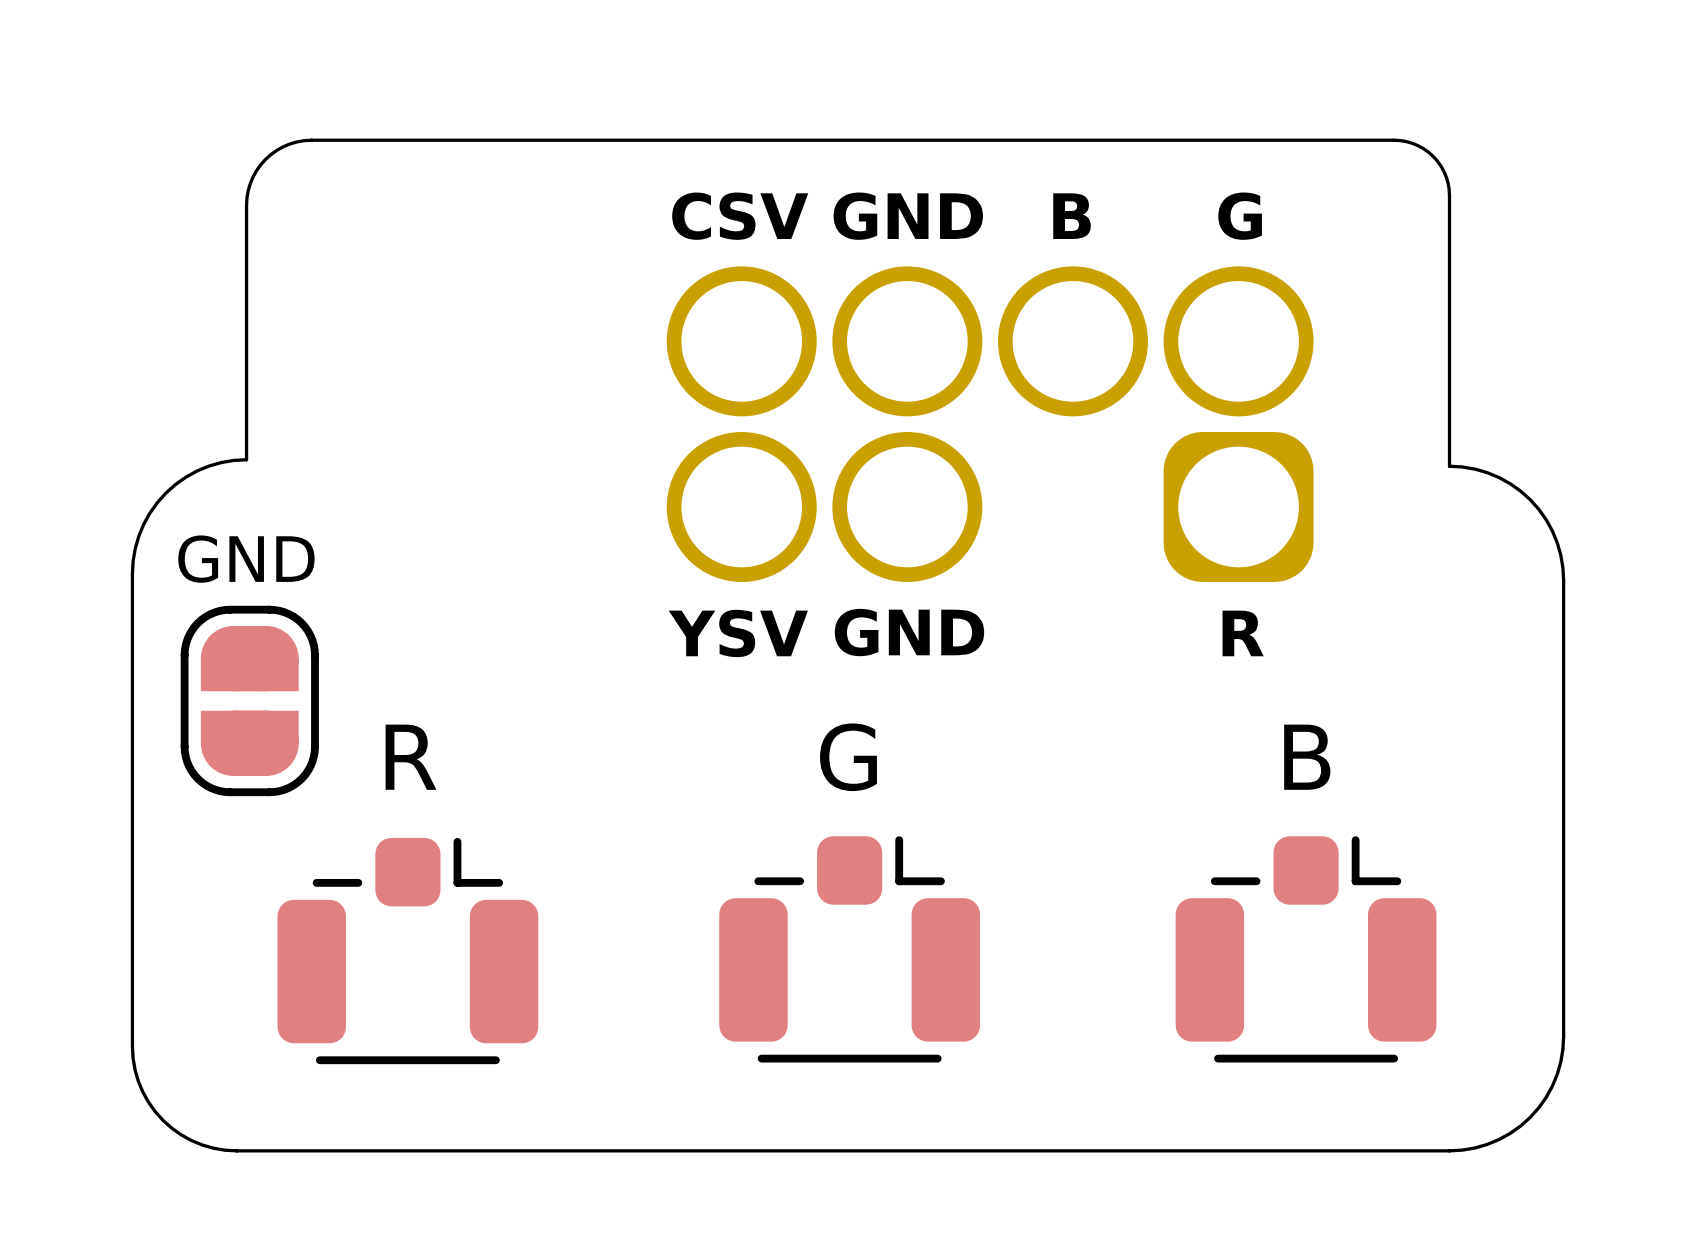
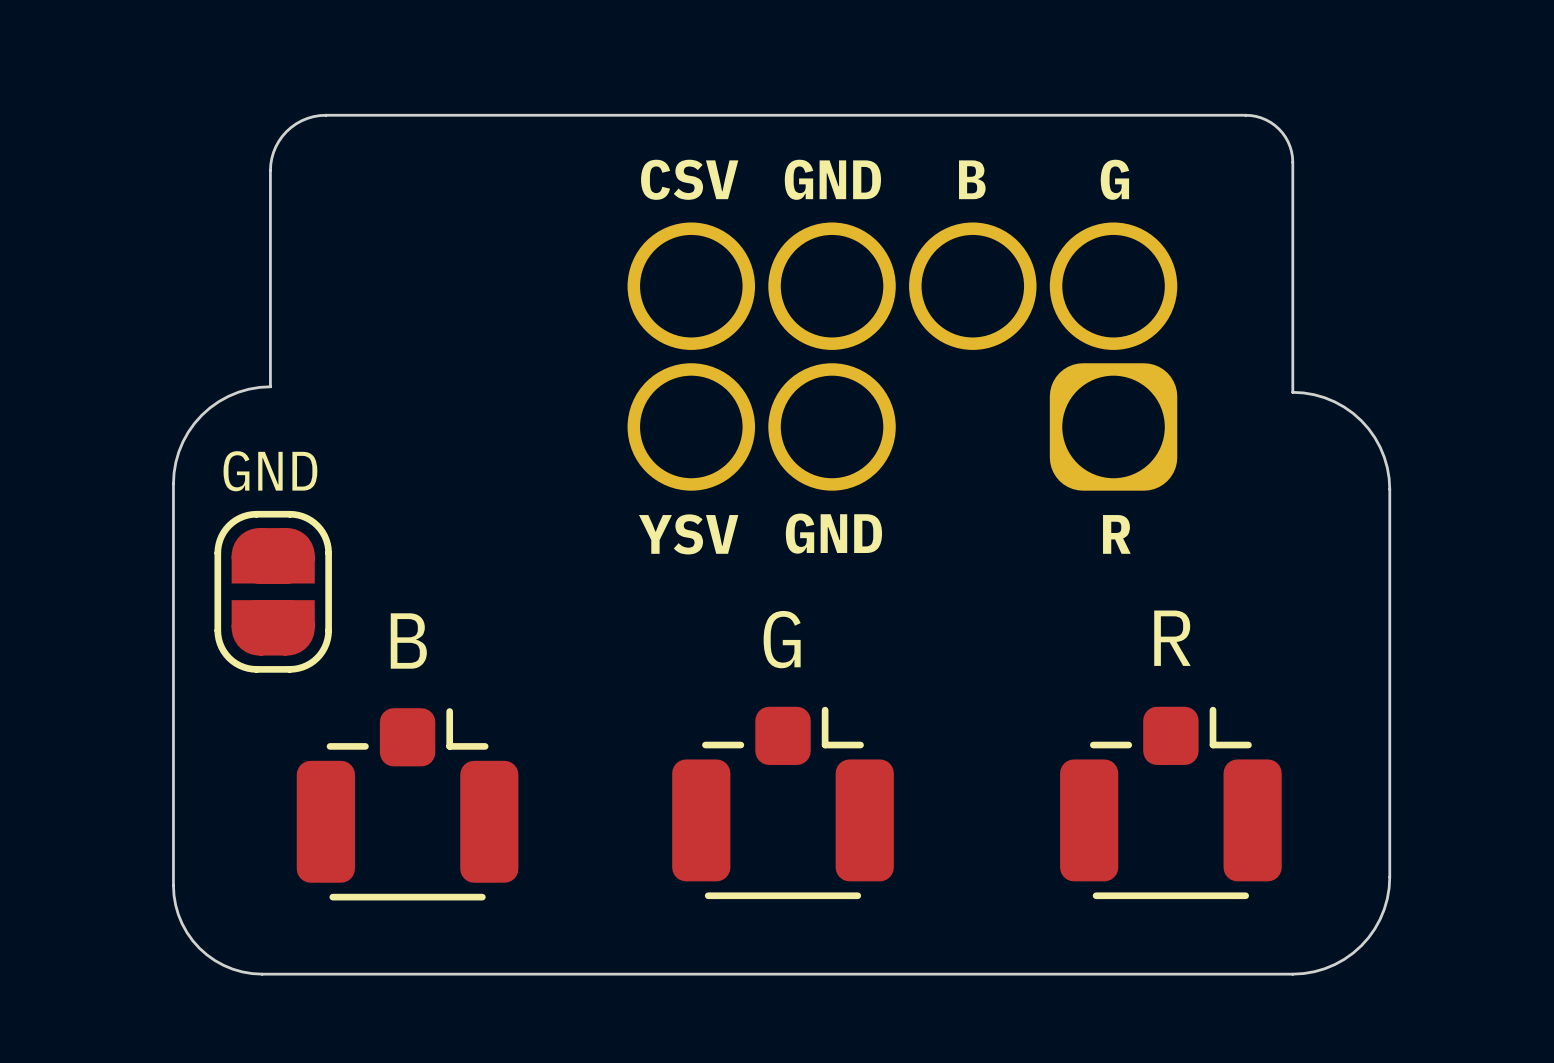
part value: R (411, 757) -> B (408, 640)
part value: B (1307, 757) -> R (1172, 638)

